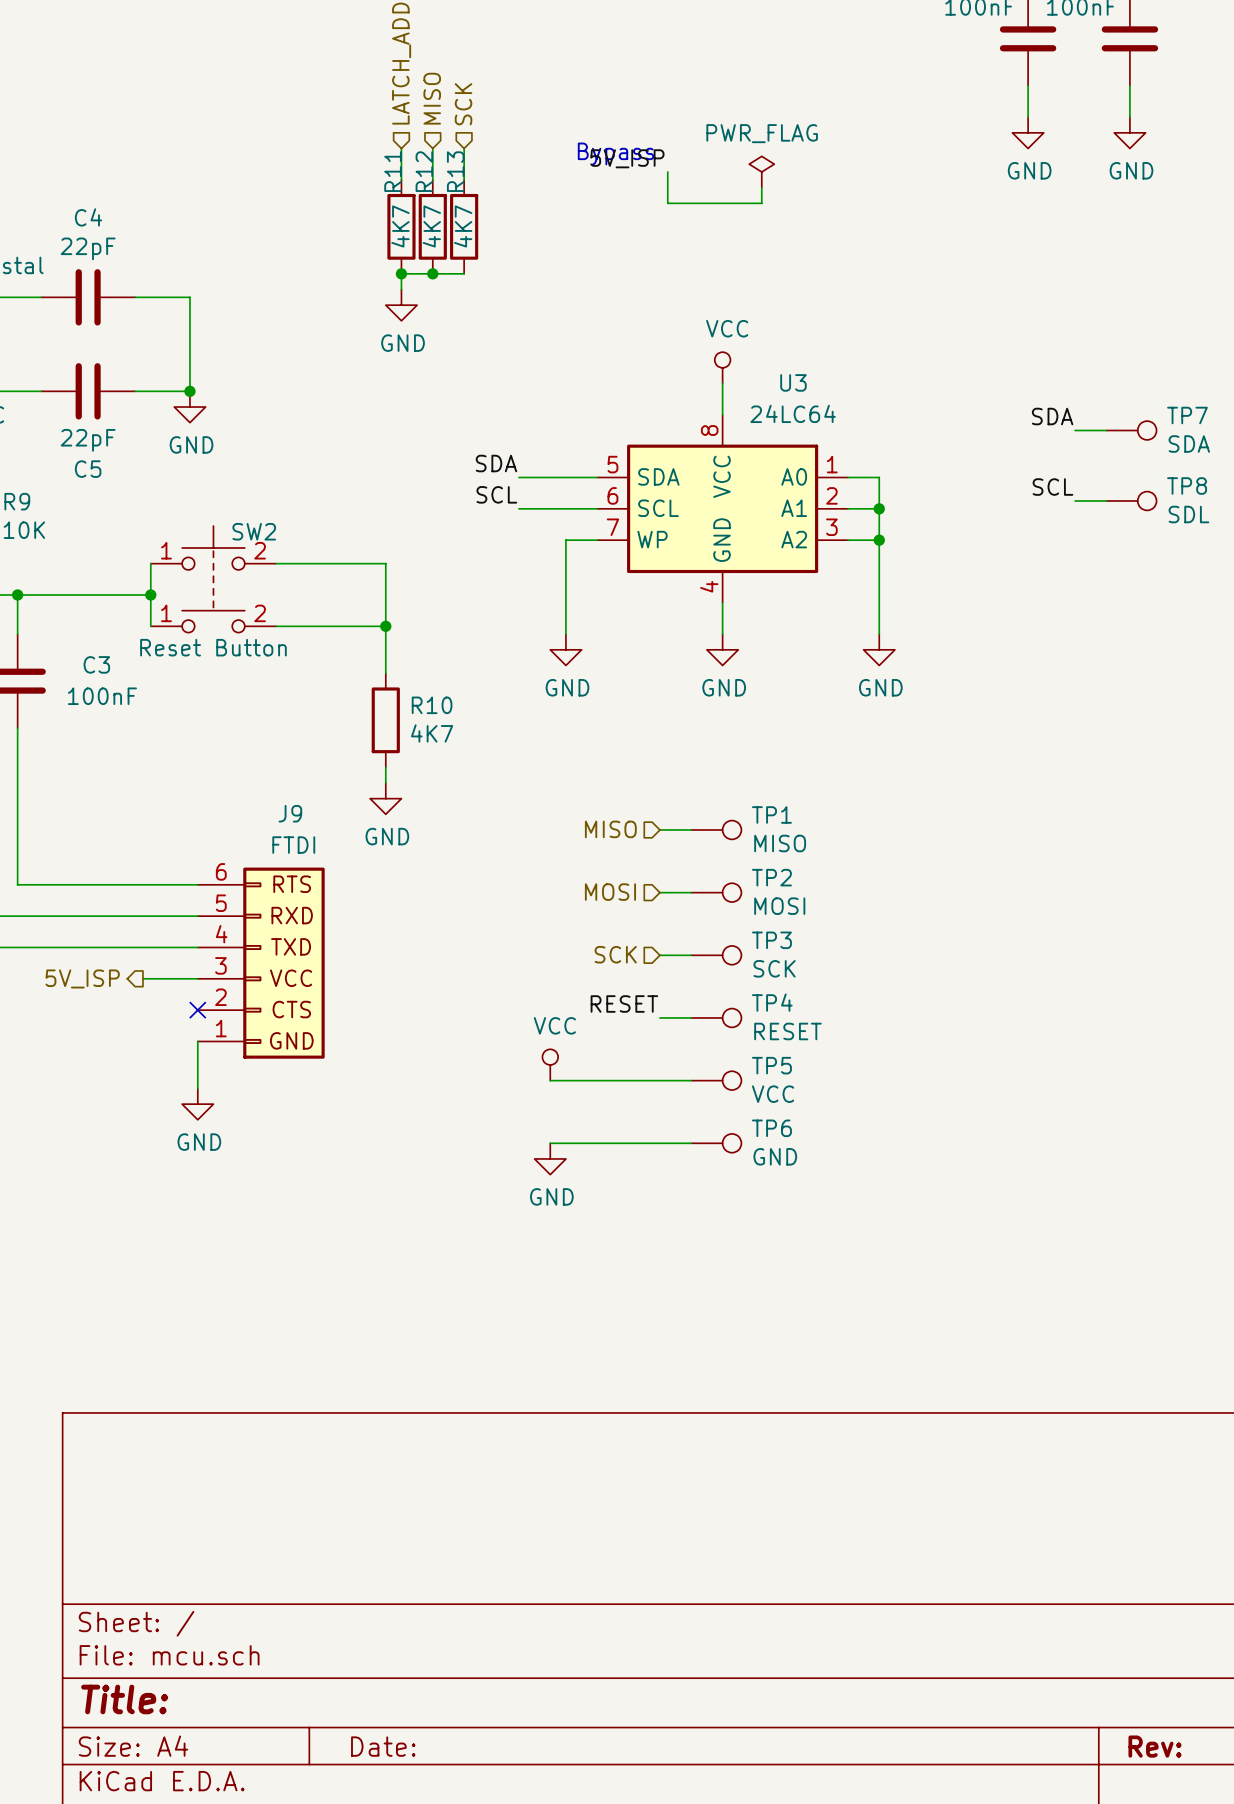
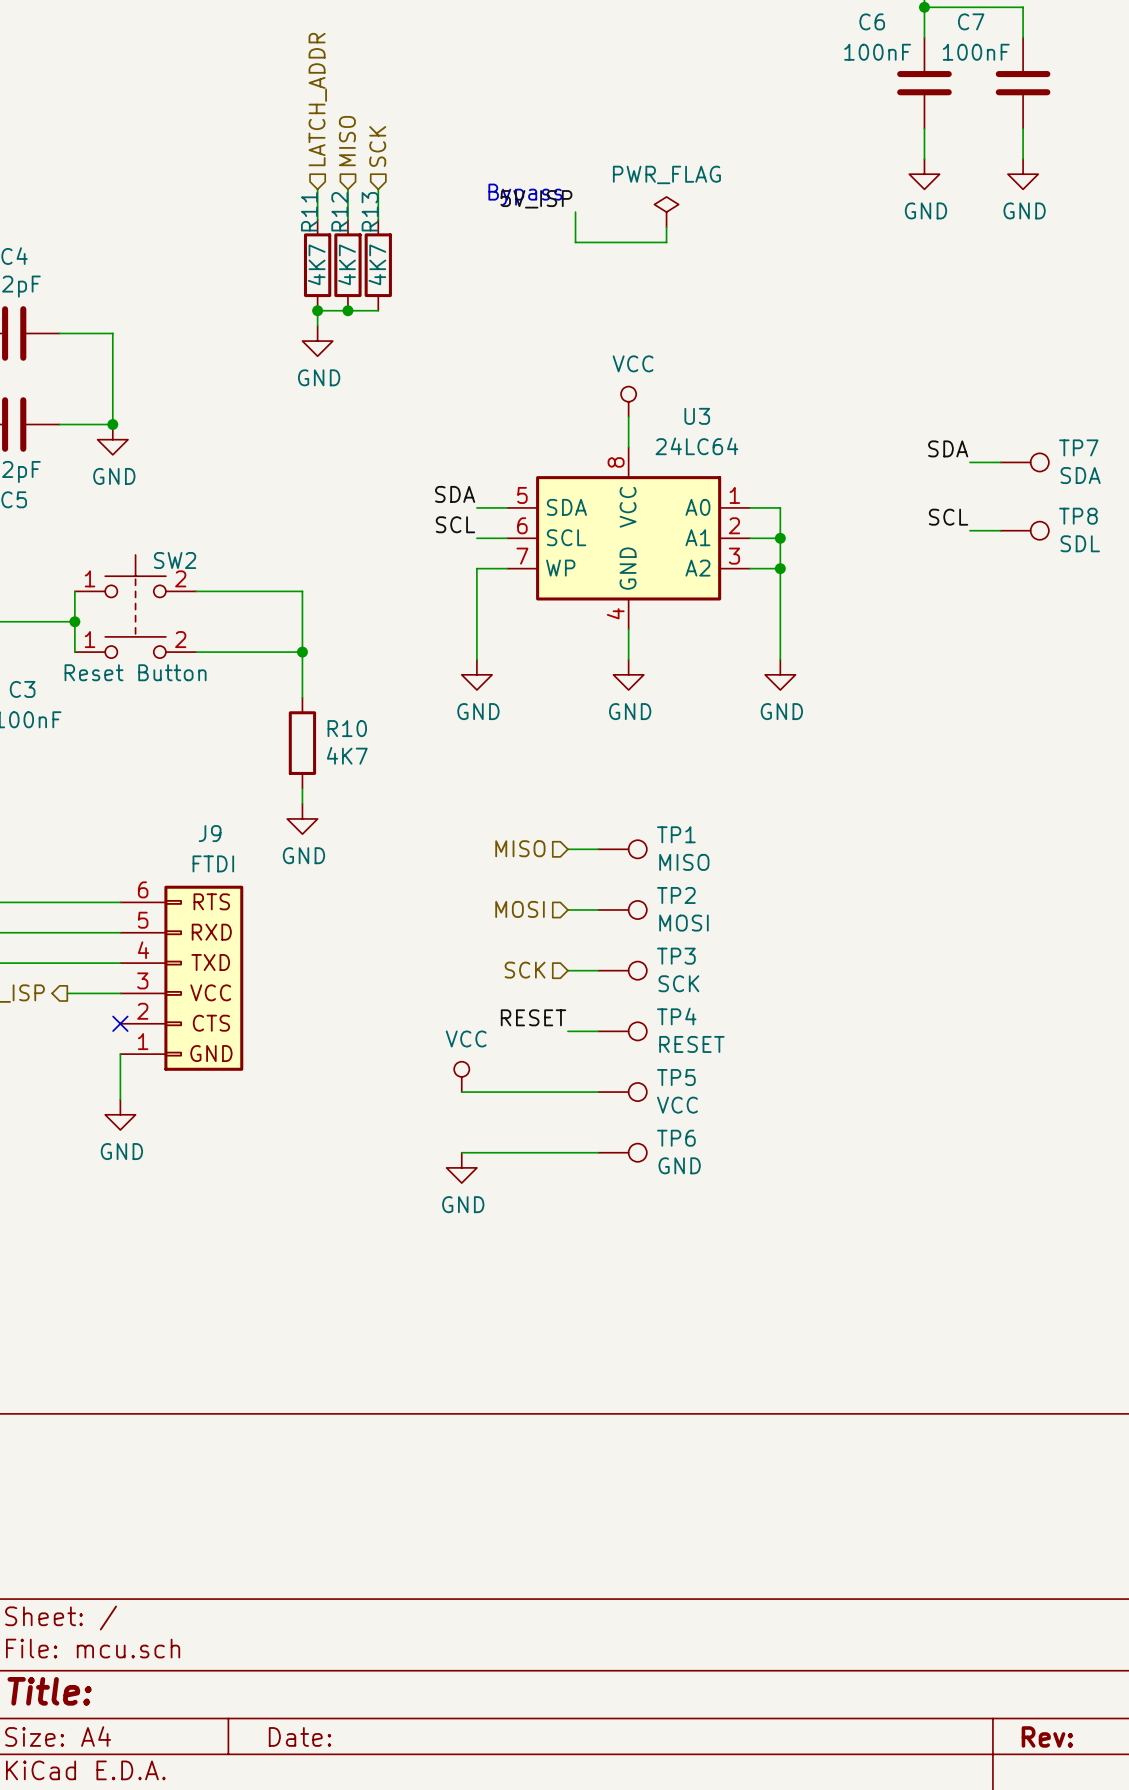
label position: SDA (496, 463) -> SDA (455, 494)
wire: (518, 477) (565, 477) -> none
label position: SCL (496, 494) -> SCL (455, 524)
wire: (518, 508) (565, 508) -> none

